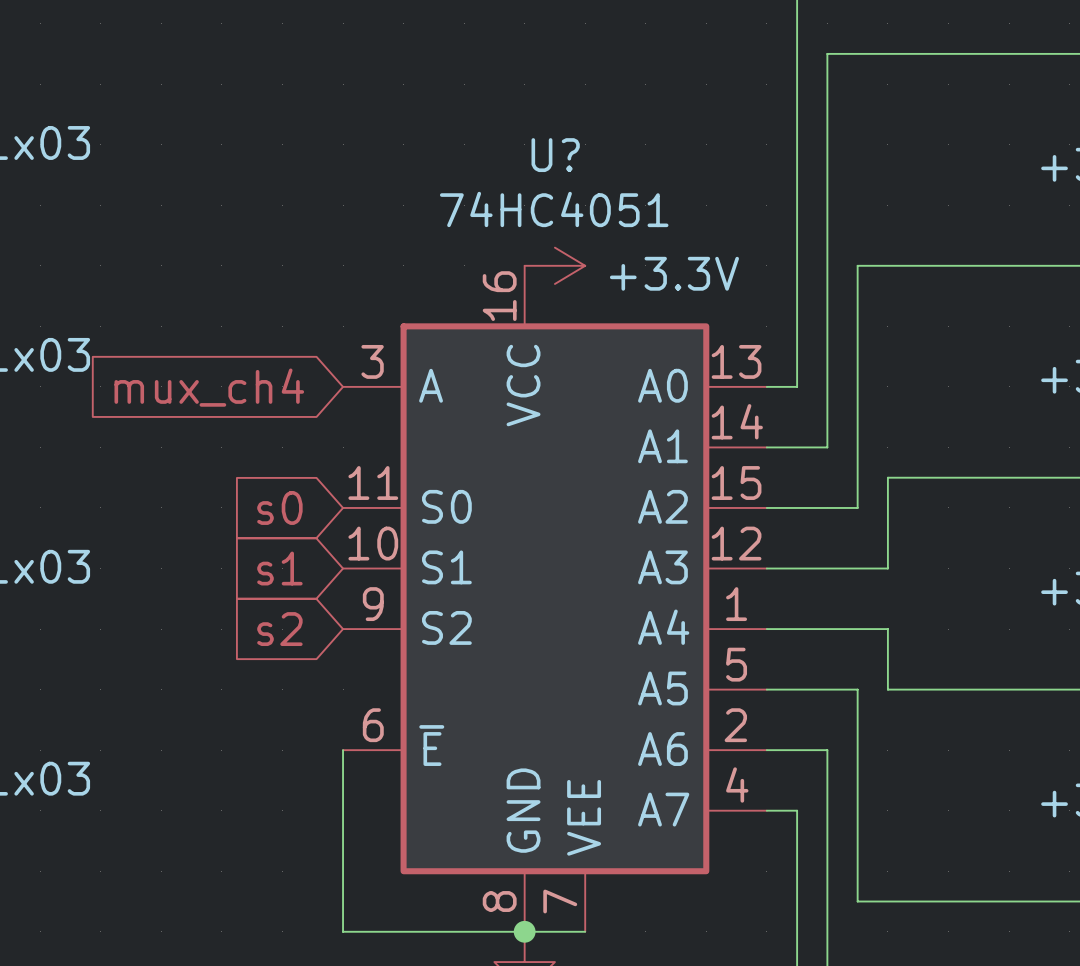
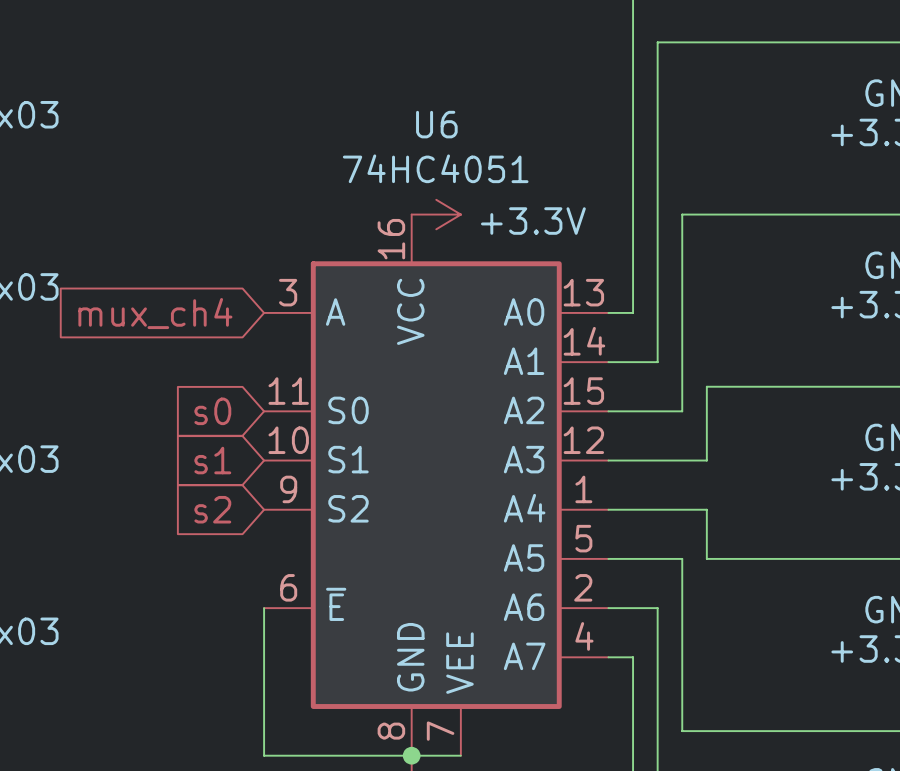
U? name: U? (555, 155) -> U6 (436, 124)

